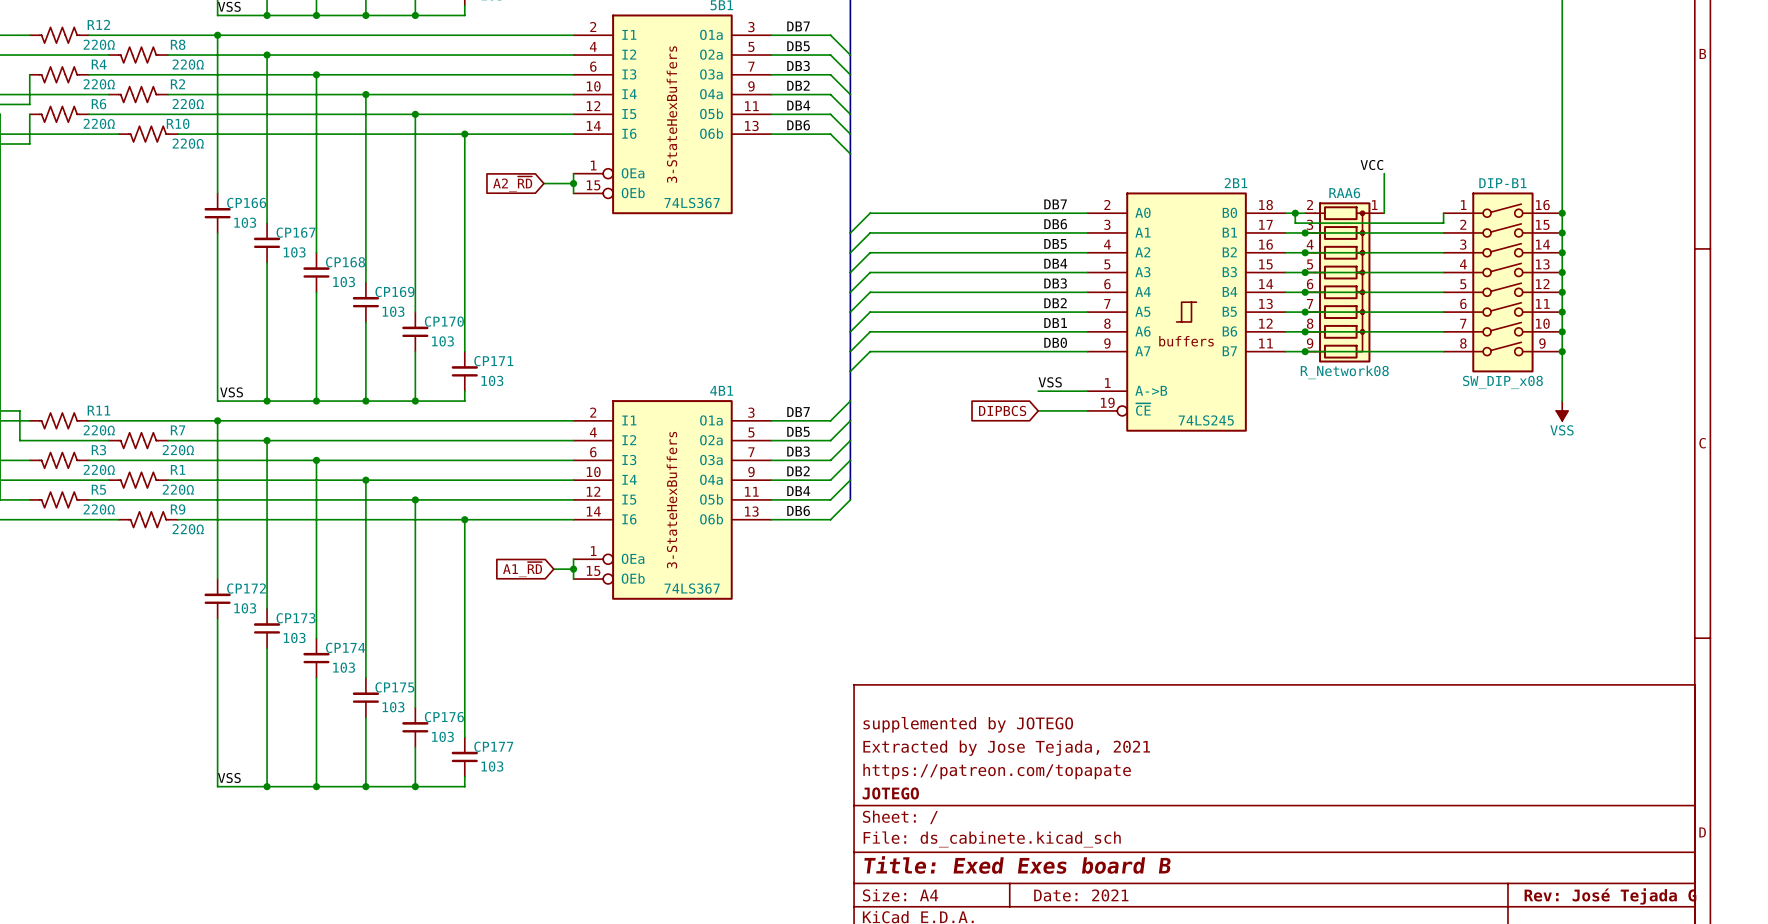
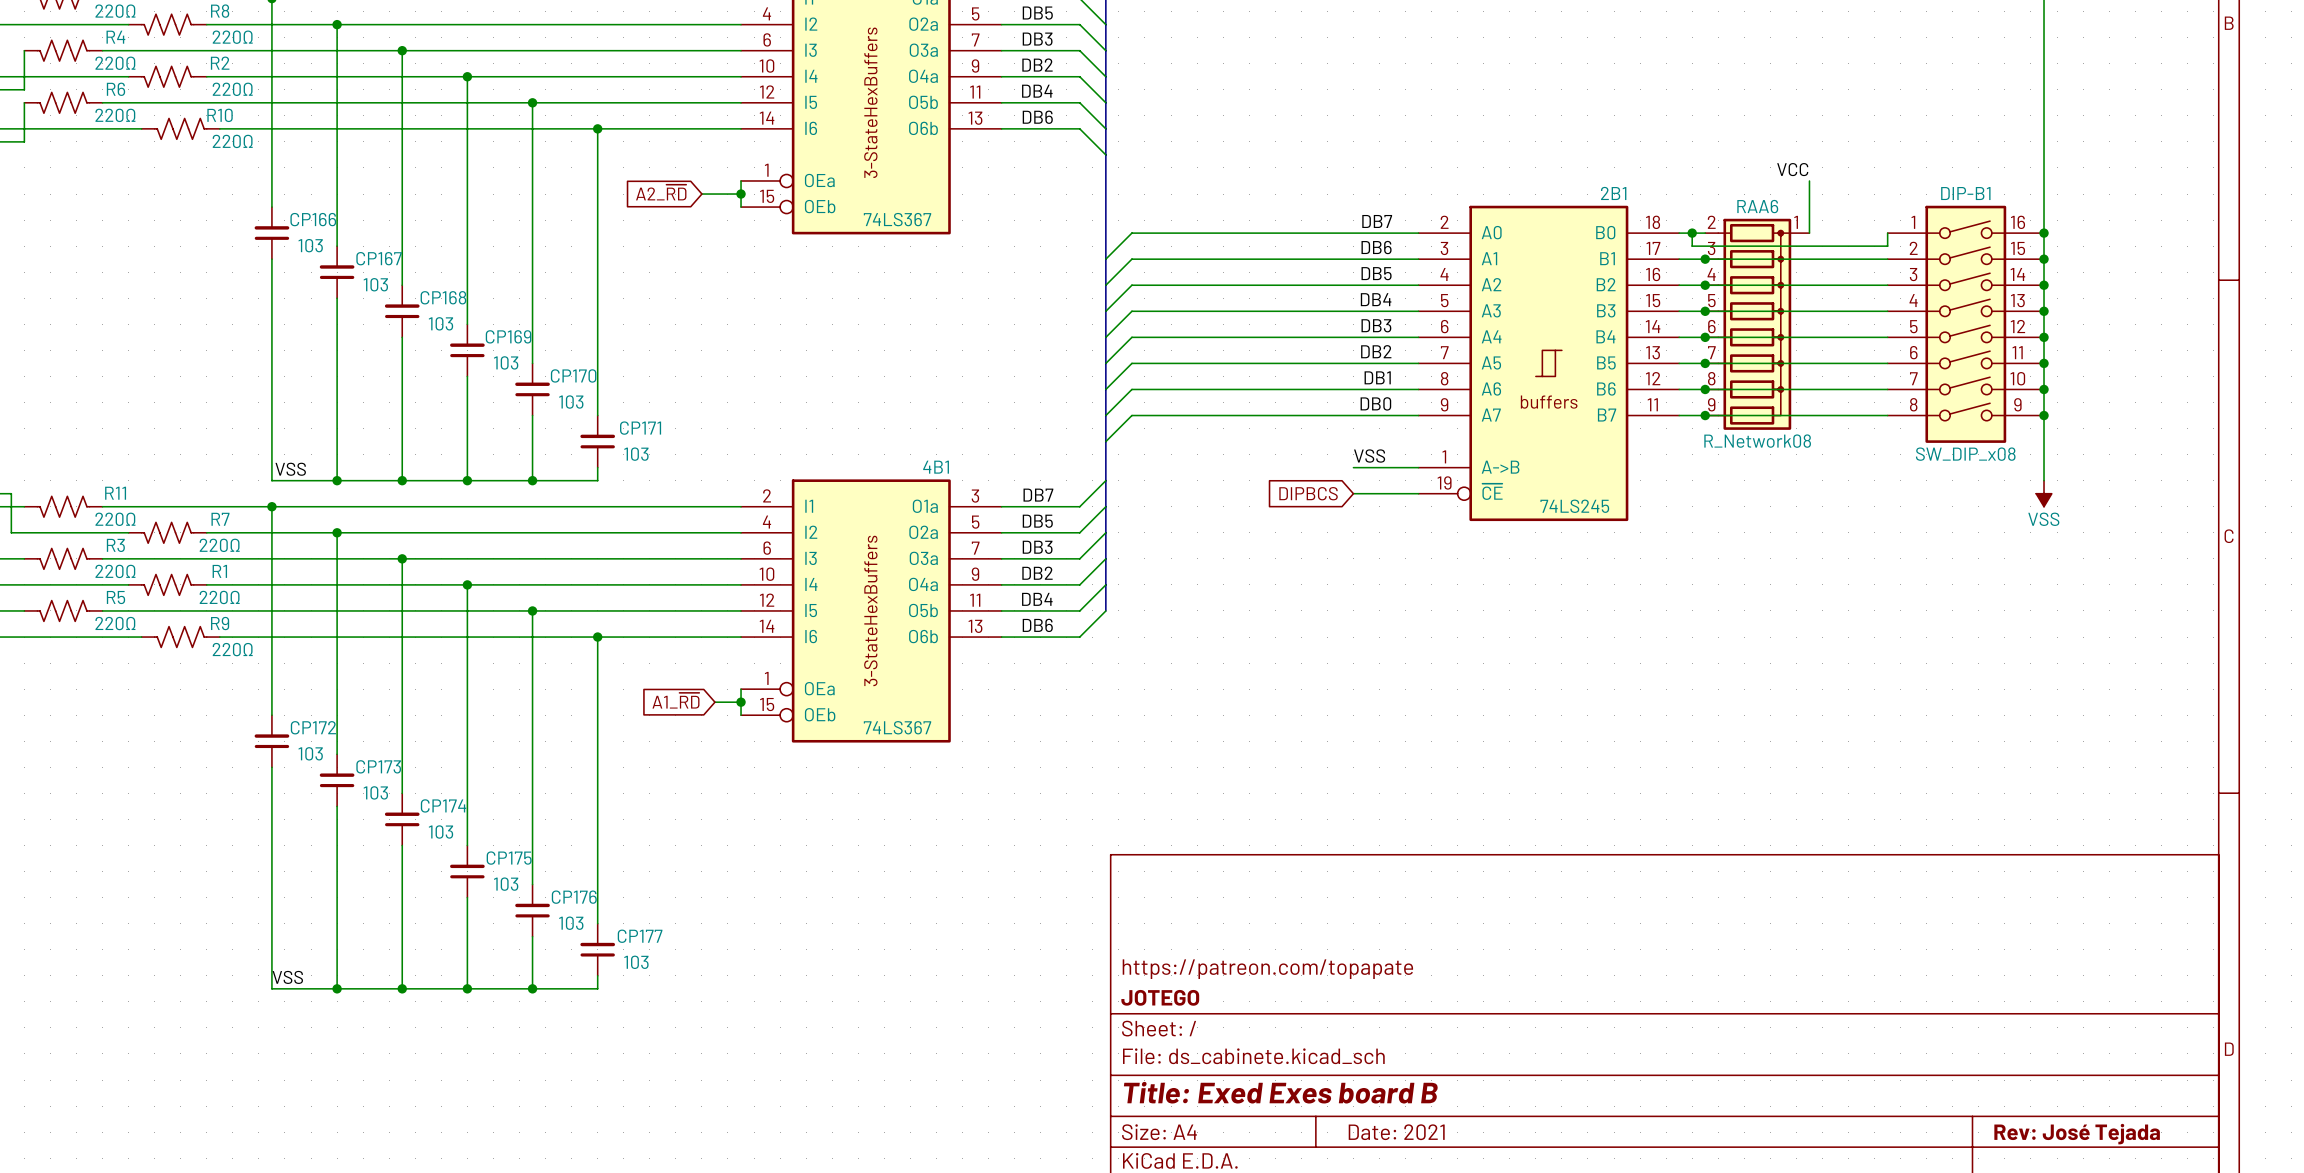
title block: supplemented by JOTEGO (968, 724) -> none
title block: Extracted by Jose Tejada, 2021 (1006, 748) -> none
title block: Rev: José Tejada G (1610, 896) -> Rev: José Tejada (2077, 1134)

